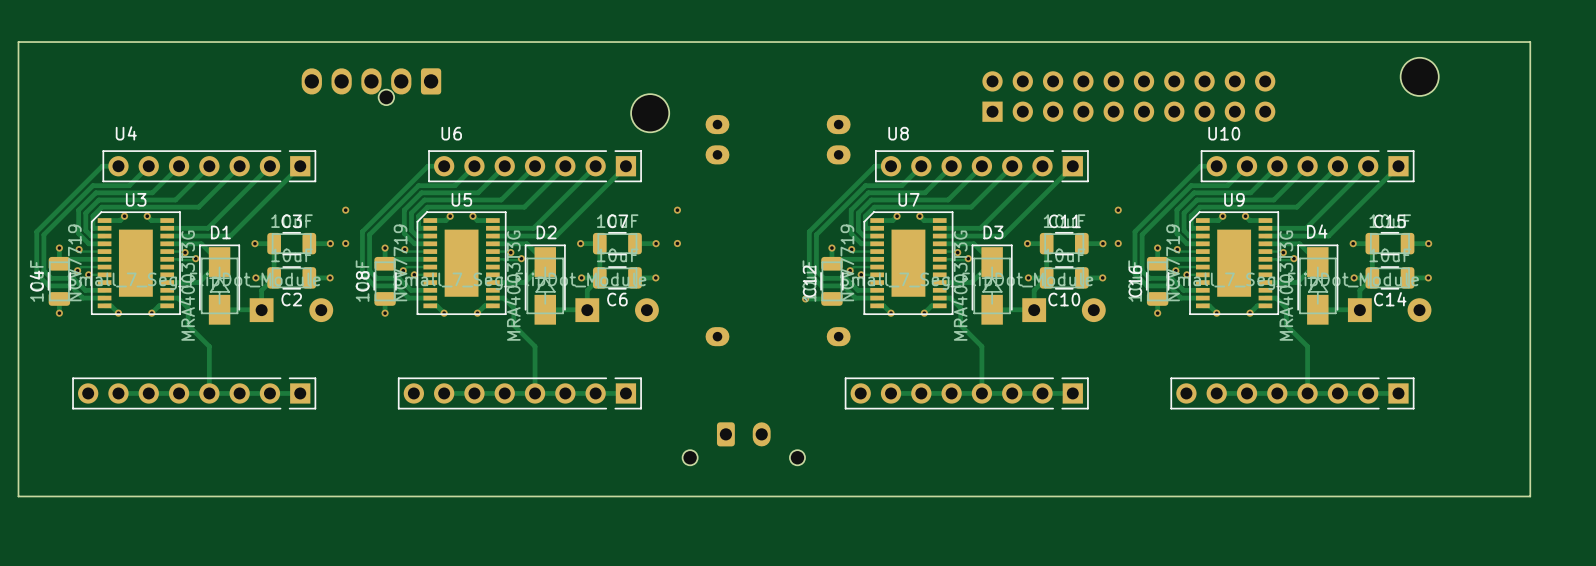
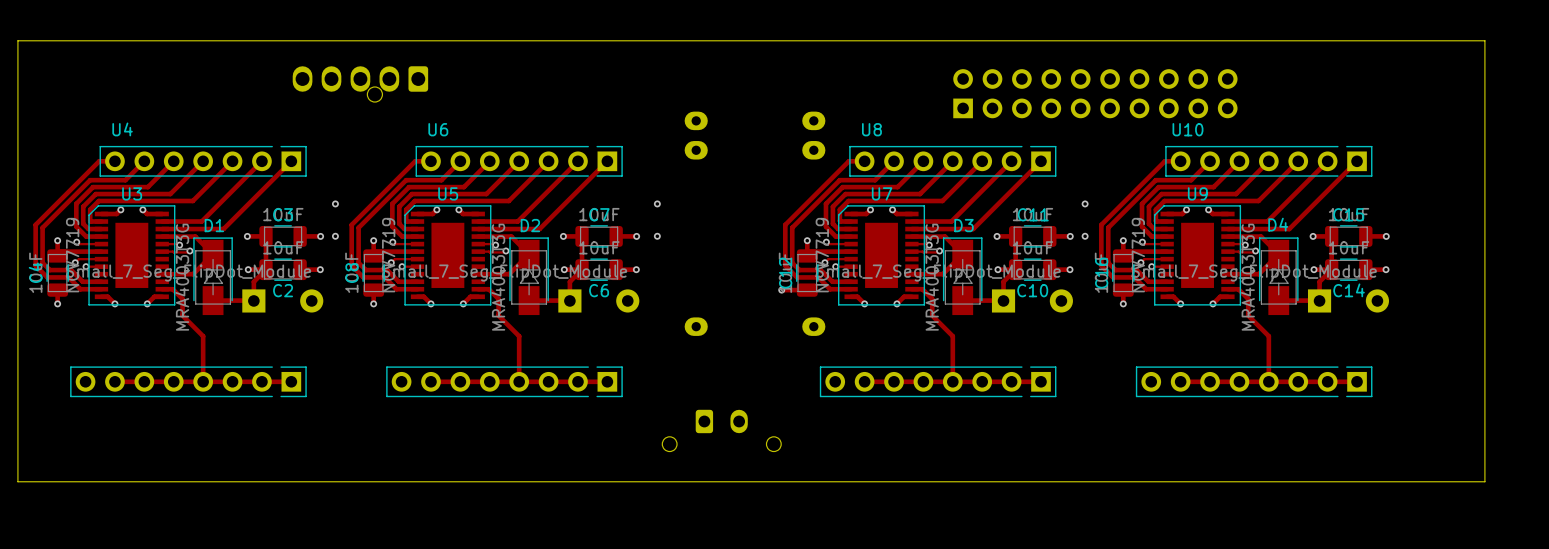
part: (1419, 76) -> none
part: (650, 113) -> none

